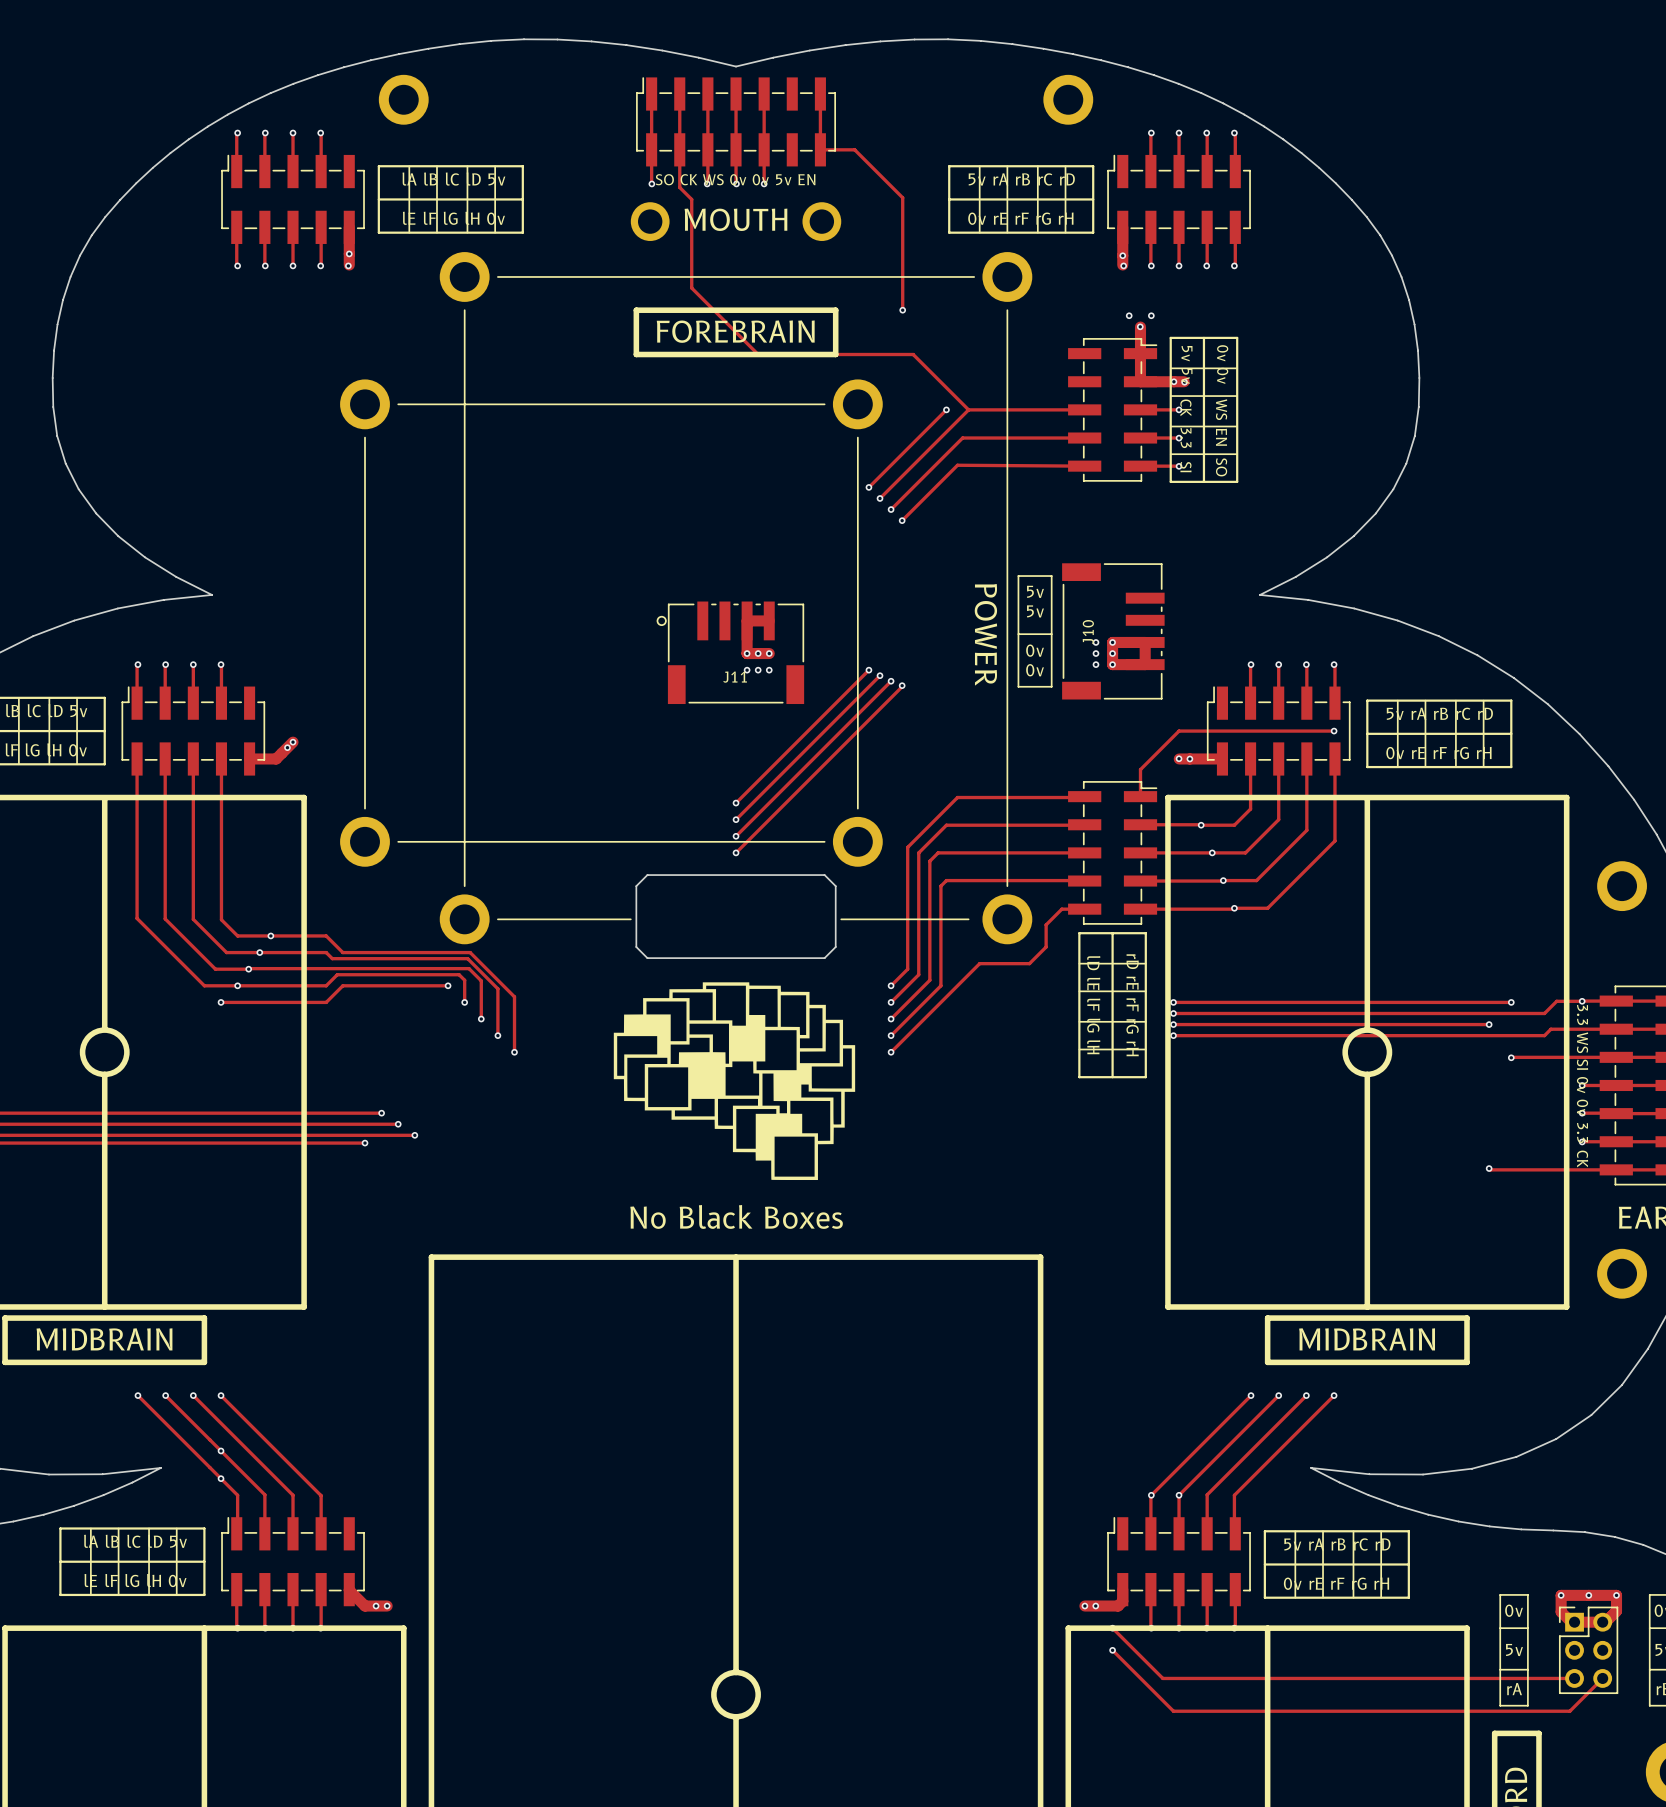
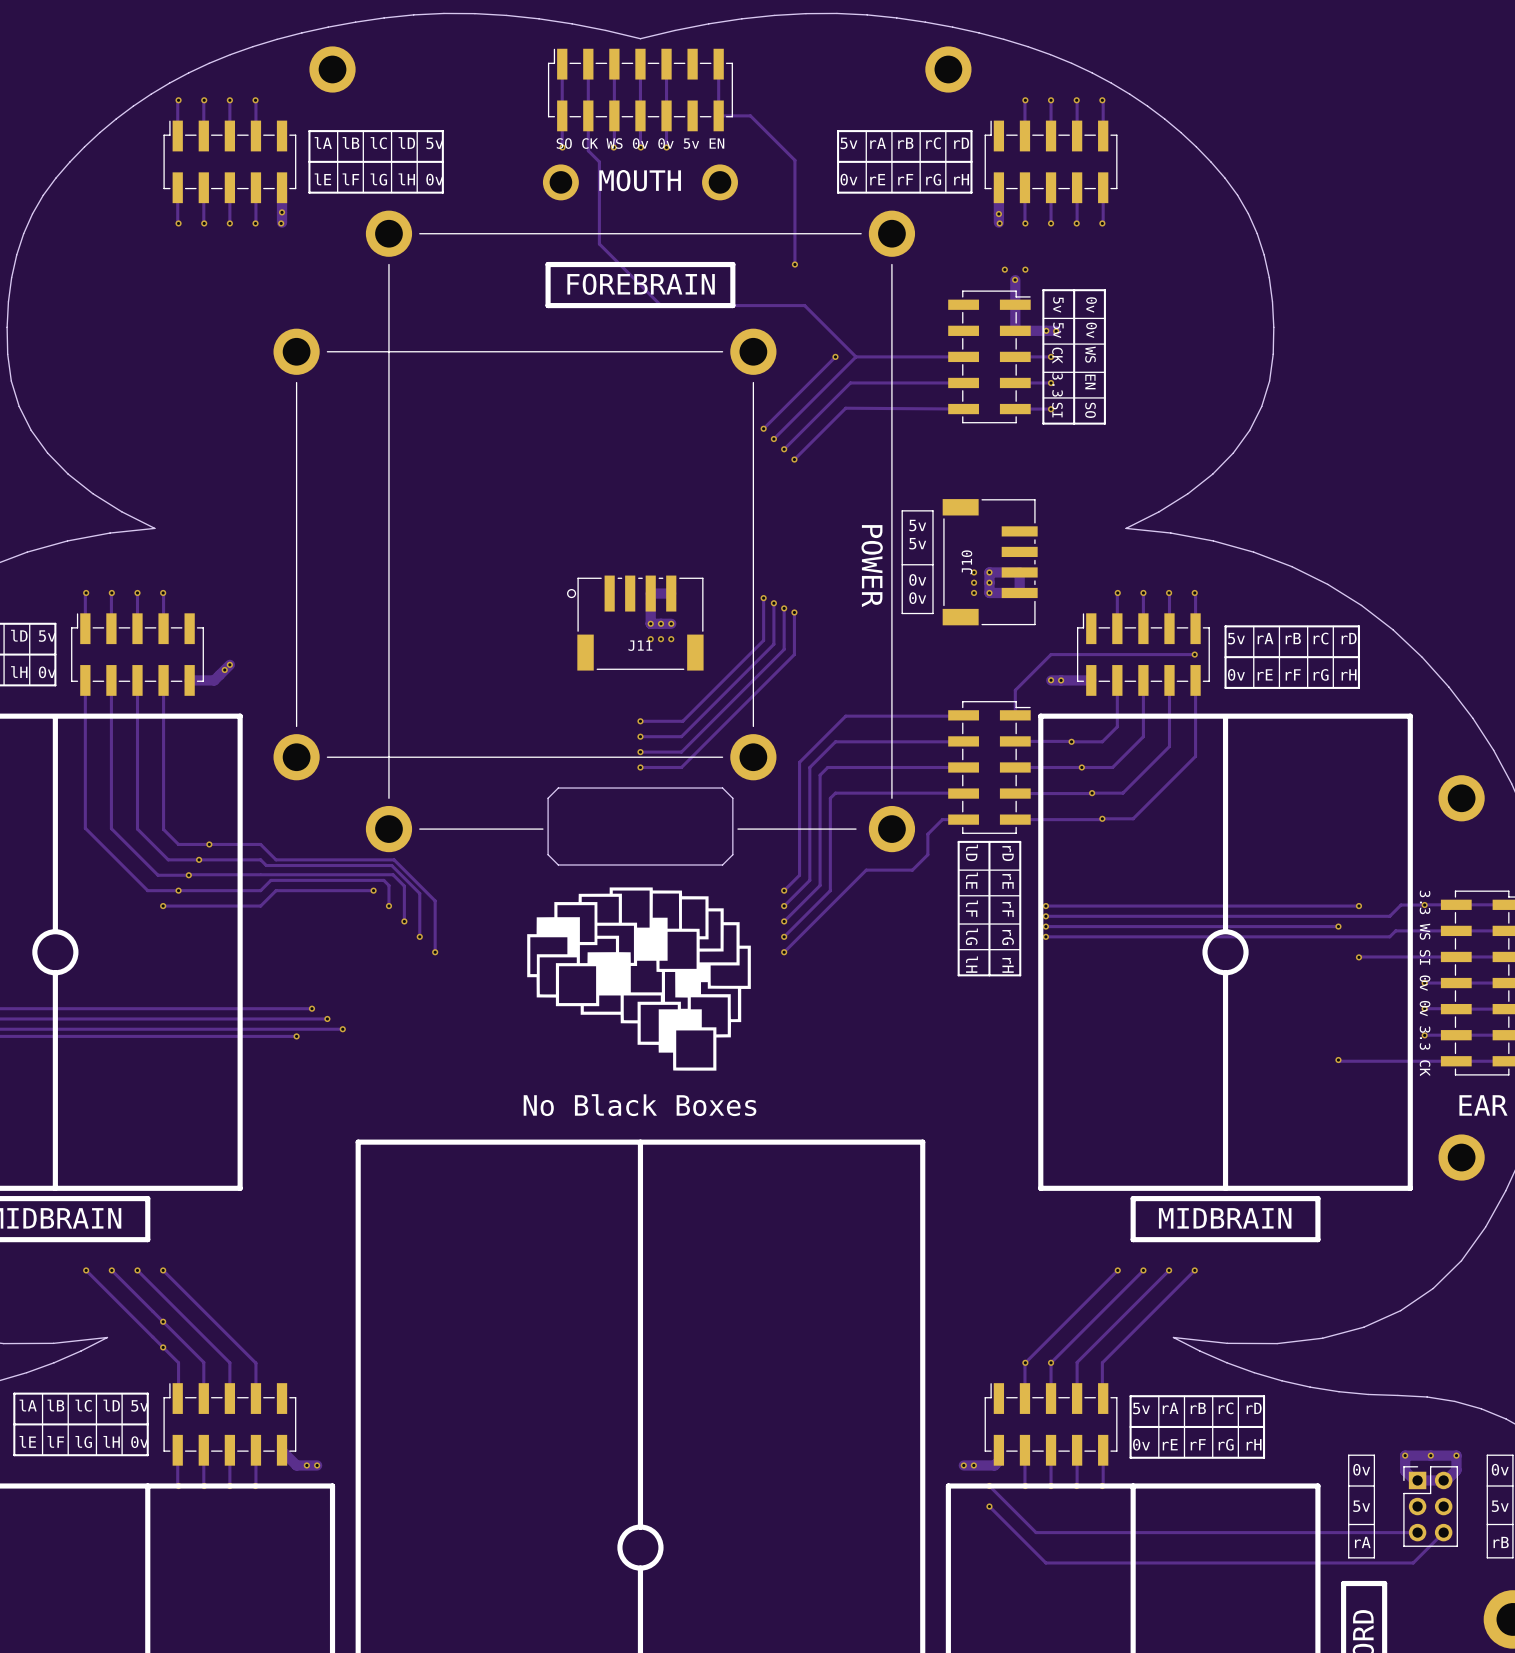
track: (769, 620) (747, 620) (747, 653) (769, 653) -> (671, 593) (650, 593) (650, 623) (671, 623)
J11 position: (730, 652) -> (635, 623)
via: (747, 653) -> none
via: (758, 653) -> none
via: (769, 653) -> none
via: (747, 670) -> none
via: (758, 670) -> none
via: (769, 670) -> none
track: (868, 670) (736, 803) -> (763, 598) (763, 640) (682, 721) (640, 721)
track: (880, 675) (736, 819) -> (773, 603) (773, 644) (681, 736) (640, 736)
track: (891, 681) (736, 836) -> (784, 608) (784, 649) (681, 752) (640, 752)
track: (902, 686) (736, 852) -> (794, 613) (794, 654) (681, 767) (640, 767)
via: none -> (650, 623)
via: none -> (660, 623)
via: none -> (671, 623)
via: none -> (650, 639)
via: none -> (660, 639)
via: none -> (671, 639)

